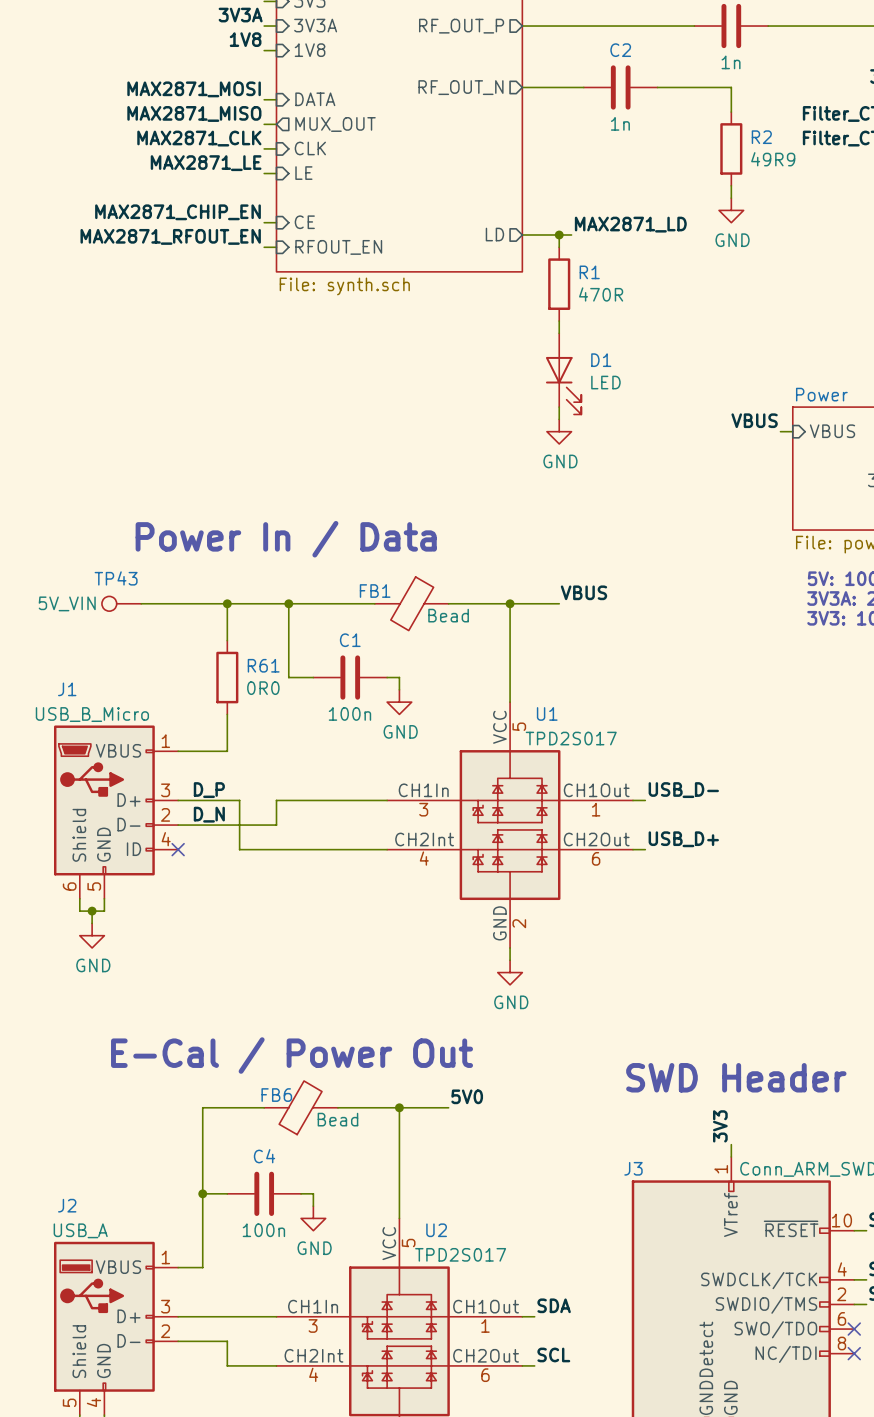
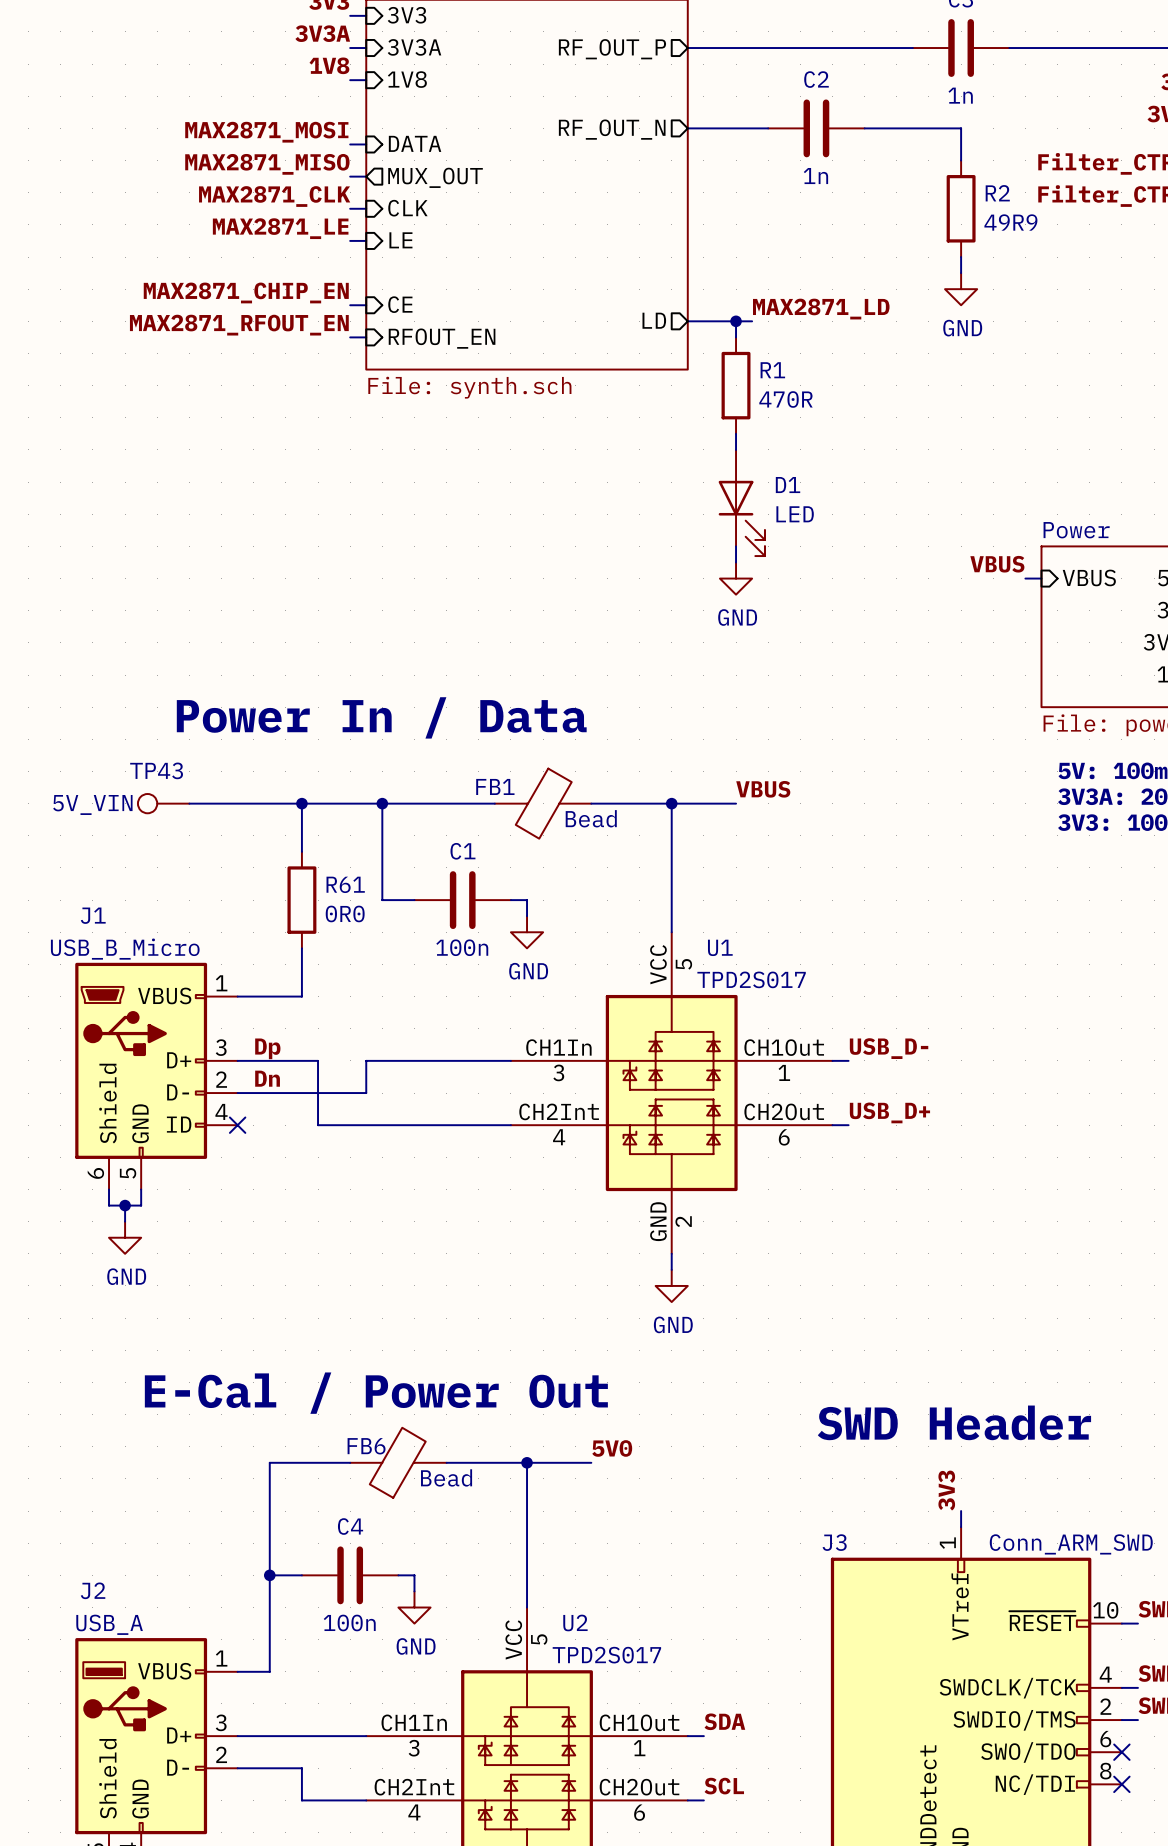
label: D_P (209, 790) -> Dp (267, 1048)
label: D_N (209, 814) -> Dn (267, 1078)

